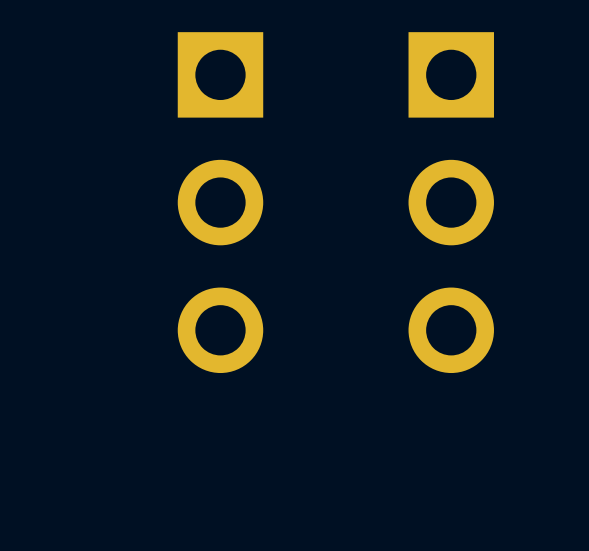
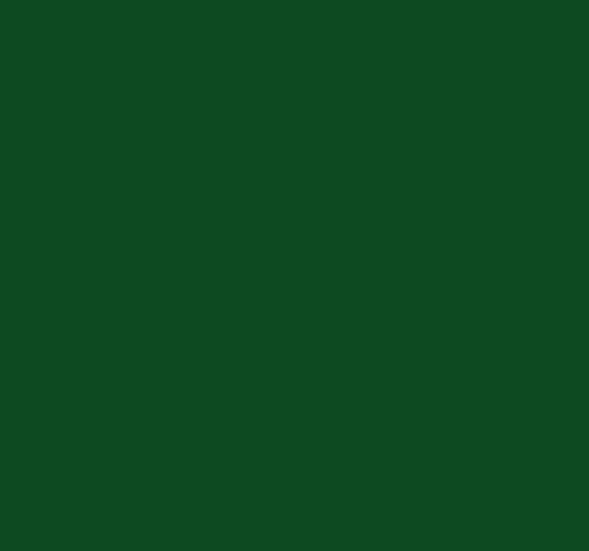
part: (220, 202) -> none
part: (451, 202) -> none

